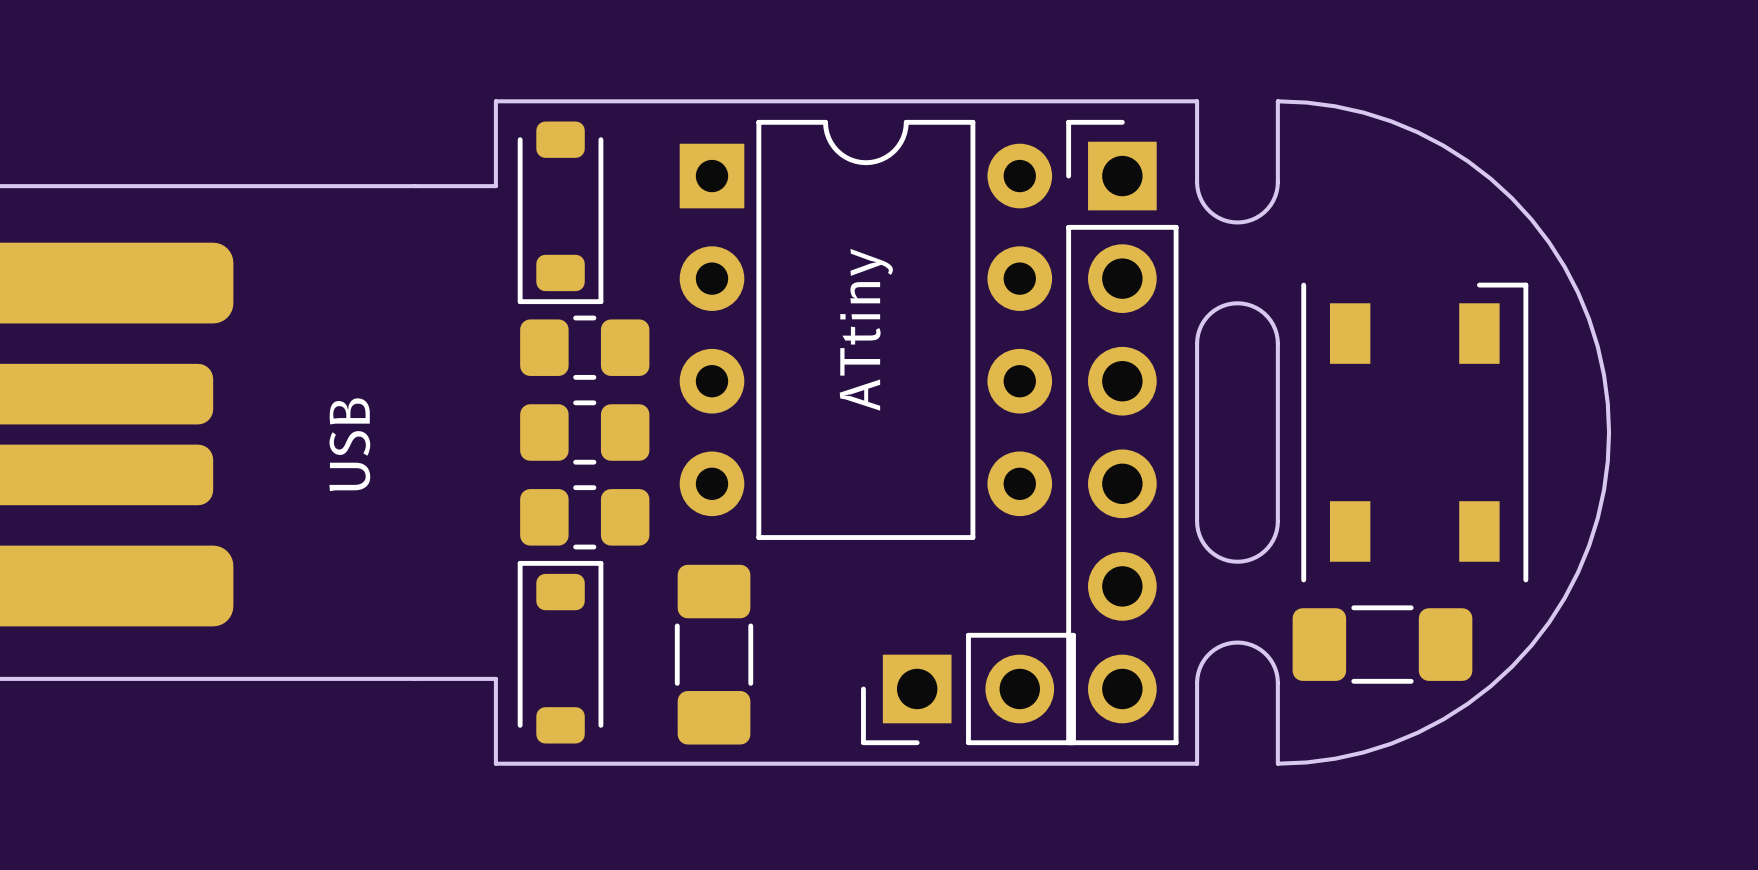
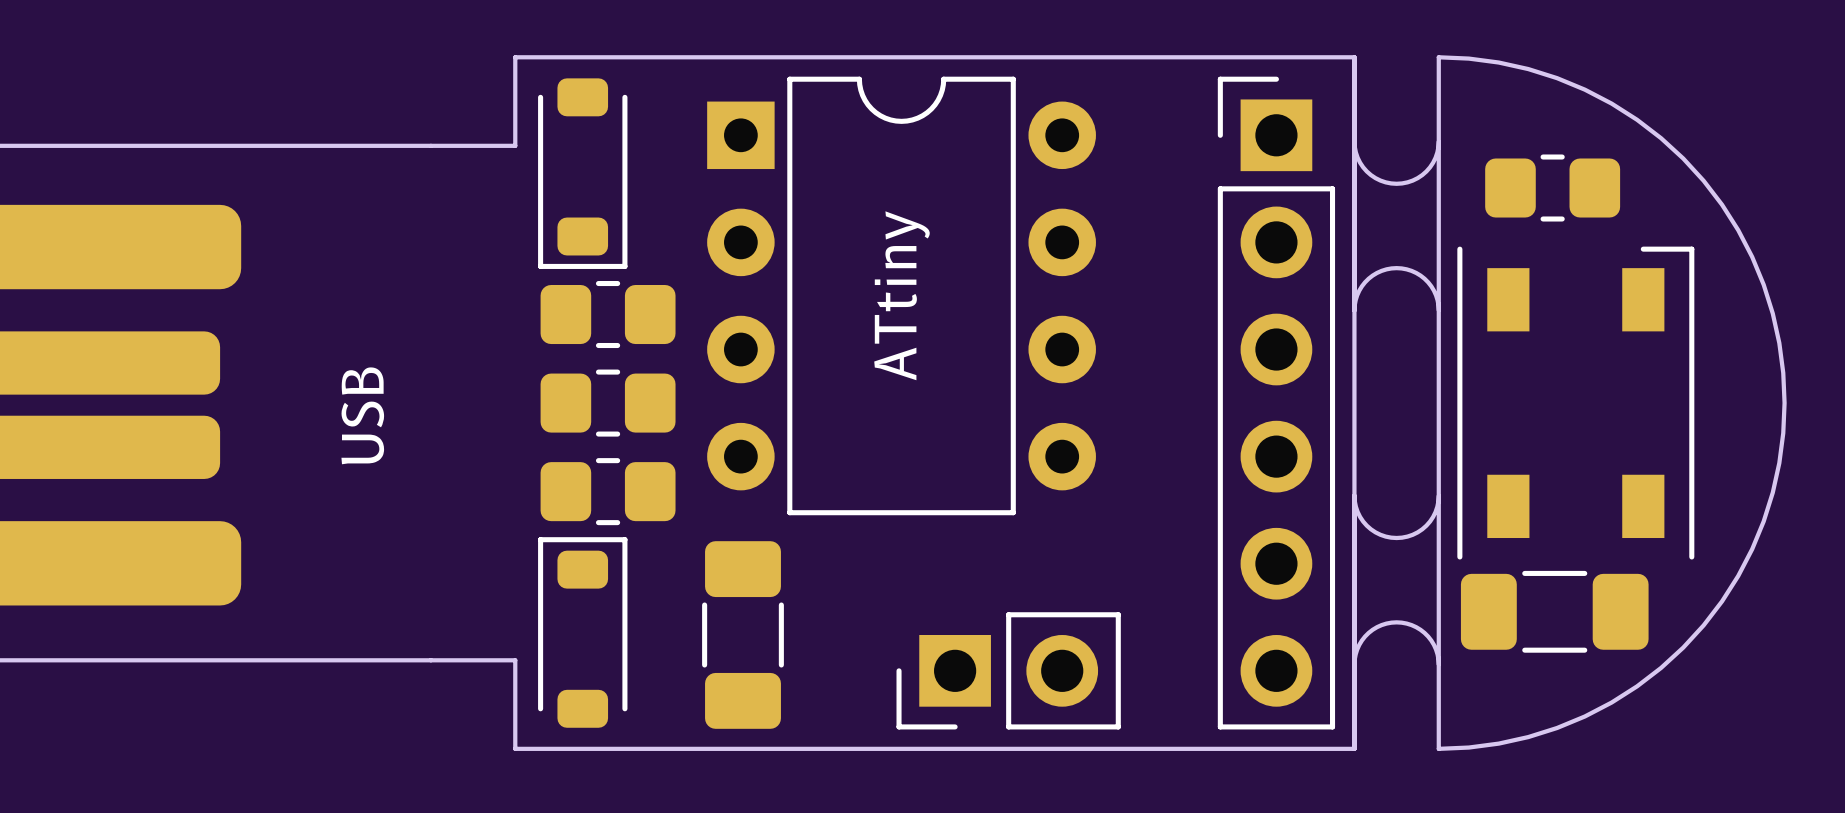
board edge: (1197, 101) (1198, 191) (1207, 208) (1218, 217) (1227, 221) (1242, 222) (1256, 217) (1267, 208) (1275, 196) (1277, 182) (1277, 101) (1335, 106) (1391, 121) (1443, 145) (1490, 178) (1512, 198) (1549, 242) (1578, 292) (1597, 346) (1607, 403) (1609, 432) (1607, 461) (1597, 518) (1578, 572) (1549, 622) (1512, 666) (1490, 686) (1443, 719) (1391, 743) (1335, 758) (1277, 763) (1277, 682) (1275, 668) (1267, 656) (1256, 647) (1242, 642) (1227, 643) (1210, 652) (1201, 664) (1198, 673) (1197, 763) -> (1247, 57) (1354, 57) (1354, 748) (1247, 748)
board edge: none -> (1438, 57) (1438, 748) (1498, 743) (1528, 737) (1584, 716) (1637, 686) (1683, 647) (1722, 601) (1738, 575) (1763, 521) (1779, 463) (1784, 403) (1779, 343) (1763, 284) (1738, 230) (1722, 204) (1683, 158) (1637, 119) (1584, 89) (1528, 69) (1468, 58) (1438, 57)
board edge: none -> (1354, 141) (1357, 157) (1366, 171) (1380, 180) (1396, 183) (1412, 180) (1426, 171) (1435, 157) (1438, 141)
part: none -> (1552, 188)
board edge: (1197, 343) (1198, 531) (1204, 544) (1214, 554) (1227, 560) (1247, 560) (1260, 554) (1267, 548) (1275, 535) (1277, 526) (1276, 333) (1270, 320) (1260, 310) (1247, 304) (1232, 303) (1218, 307) (1207, 316) (1199, 329) (1197, 343) -> none
board edge: none -> (1354, 310) (1357, 295) (1365, 282) (1377, 272) (1396, 268) (1411, 270) (1424, 278) (1433, 290) (1438, 310)
part position: (1122, 432) -> (1276, 403)
part position: (1414, 432) -> (1575, 403)
board edge: none -> (1354, 495) (1357, 511) (1366, 525) (1380, 534) (1396, 538) (1412, 534) (1426, 525) (1435, 511) (1438, 495)
part position: (1382, 644) -> (1554, 611)
board edge: none -> (1354, 664) (1359, 644) (1368, 632) (1381, 625) (1396, 622) (1411, 625) (1424, 632) (1433, 644) (1438, 664)

